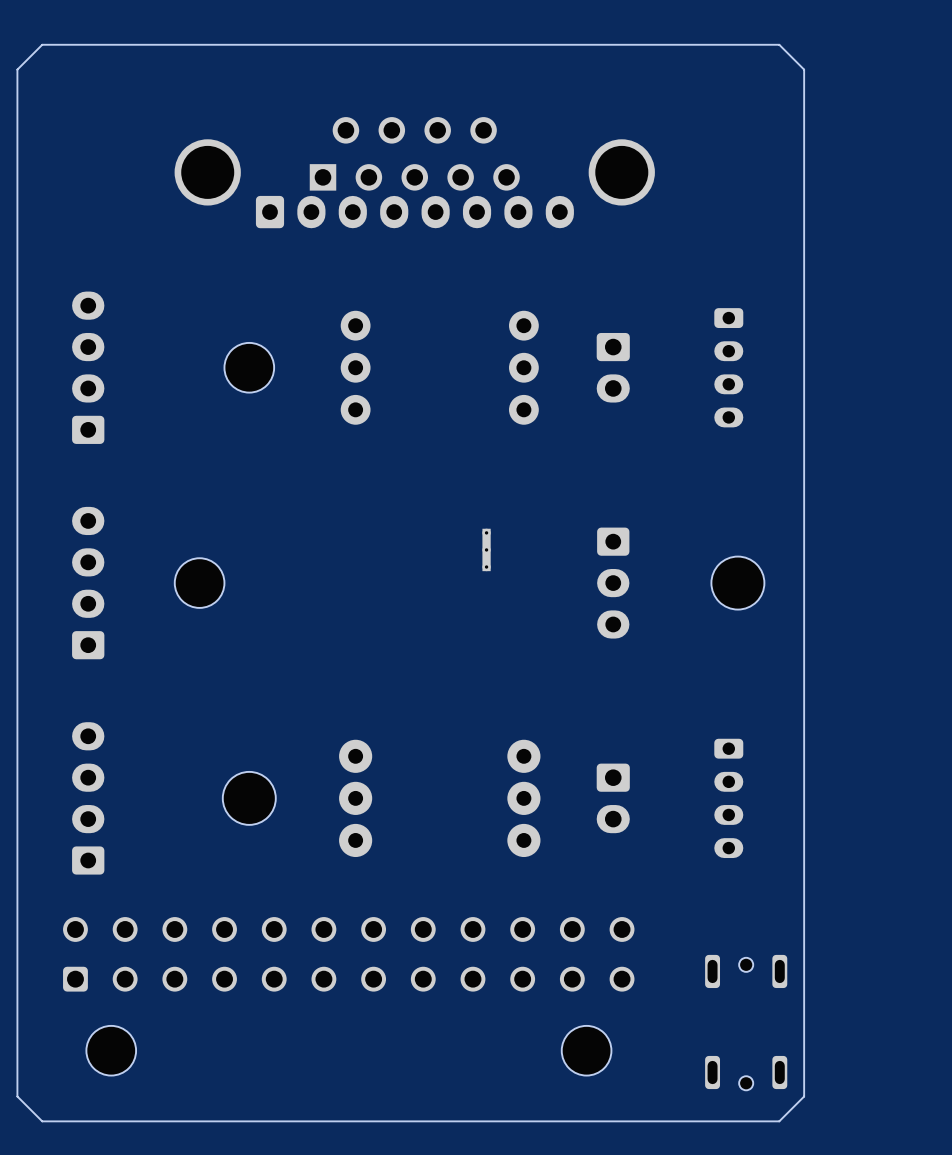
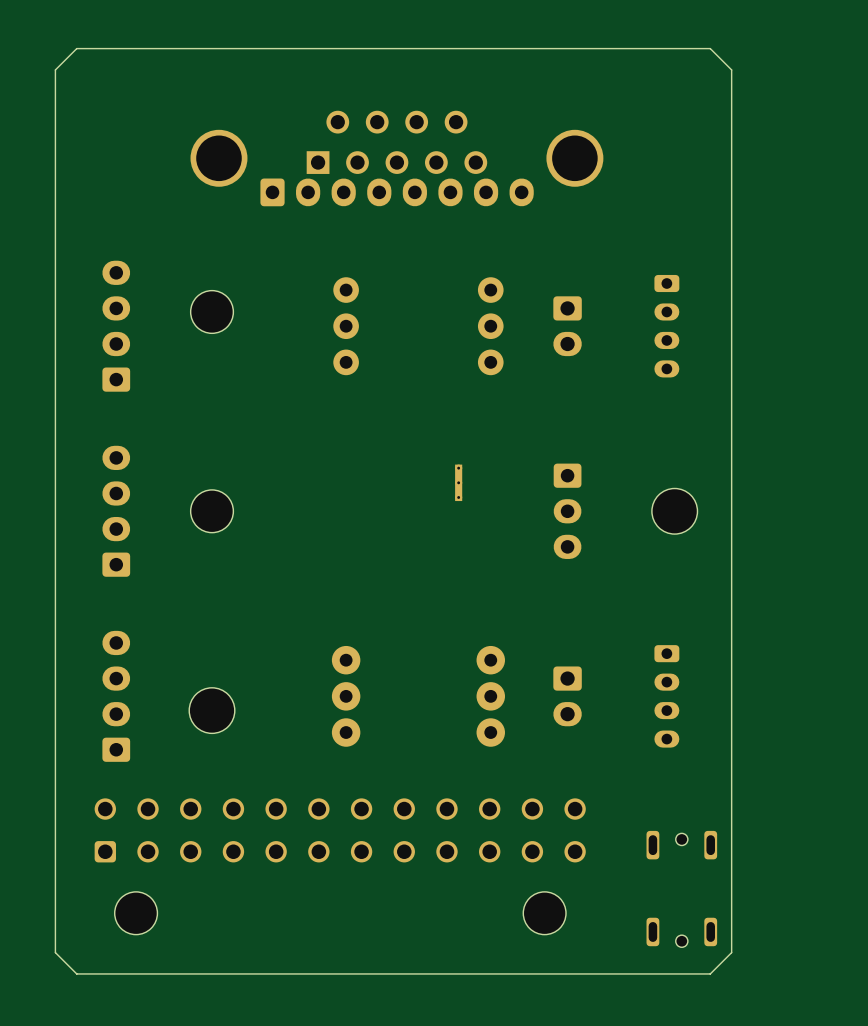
part position: (249, 367) -> (212, 311)
part position: (249, 798) -> (212, 710)

